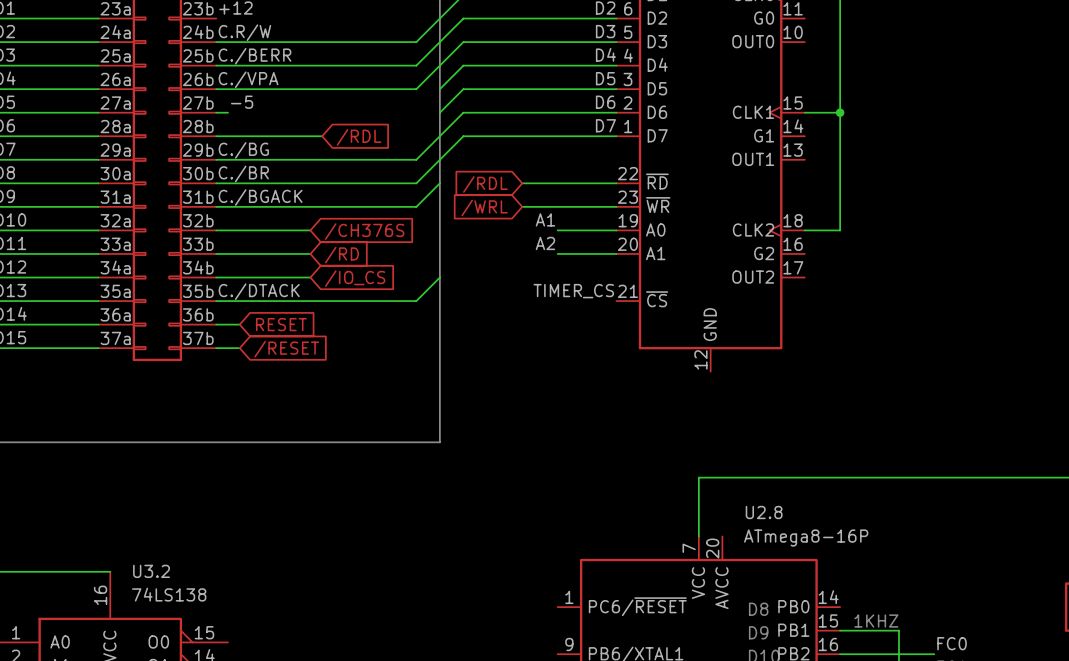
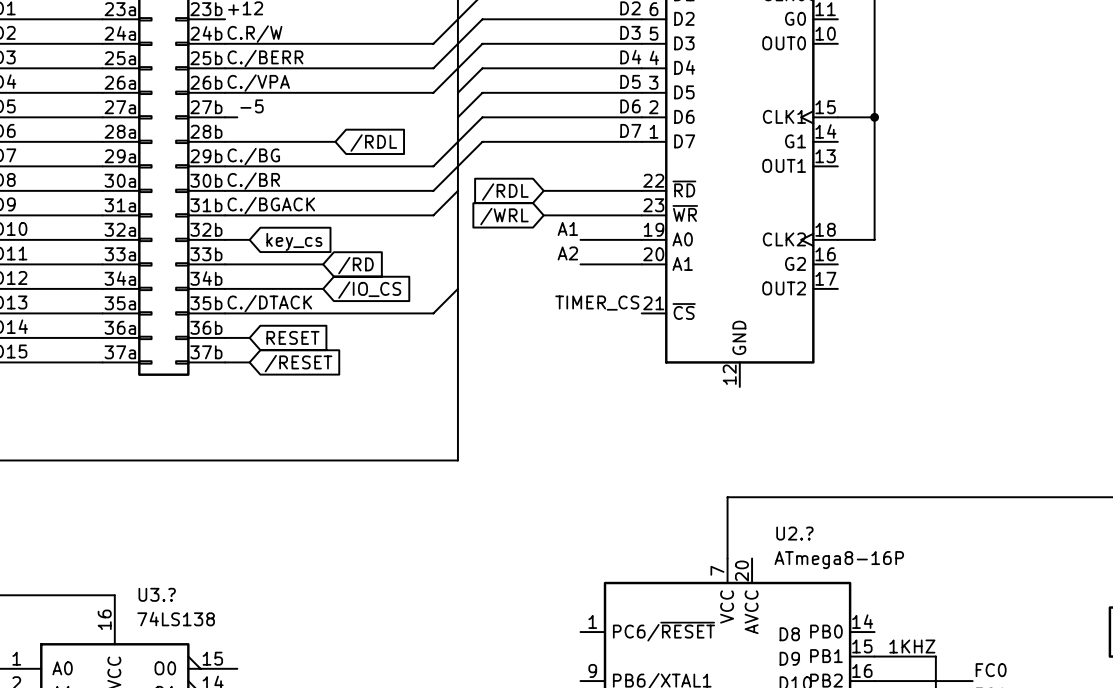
wire: (239, 230) (310, 230) -> none
global label: /CH376S (364, 231) -> none
global label: none -> key_cs (294, 241)
U2.8 name: U2.8 (764, 512) -> U2.? (794, 533)
U3.2 name: U3.2 (151, 571) -> U3.? (157, 594)

